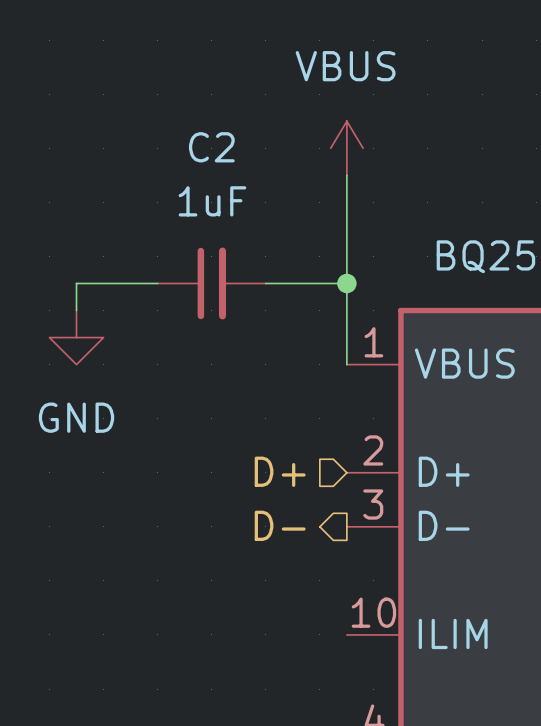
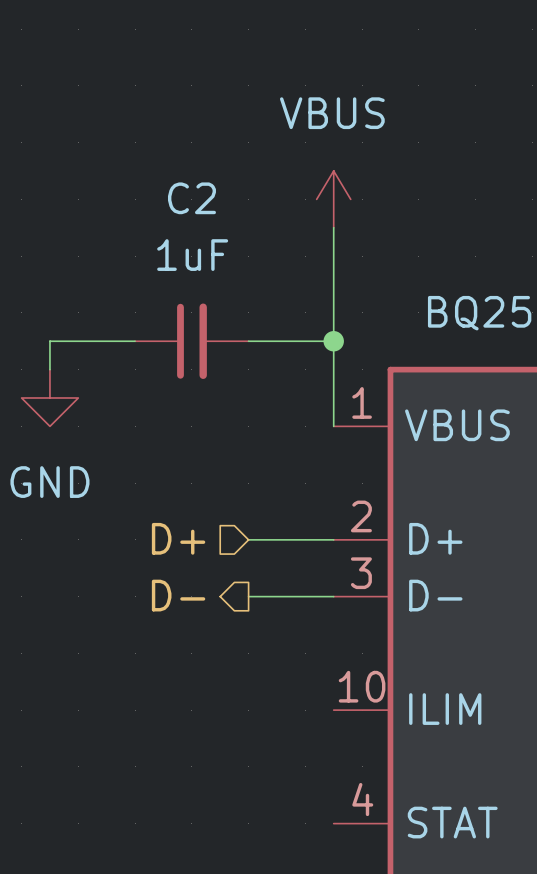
hierarchical label position: D+ (280, 471) -> D+ (178, 538)
wire: none -> (248, 539) (333, 539)
hierarchical label position: D- (280, 525) -> D- (178, 595)
wire: none -> (248, 596) (333, 596)

